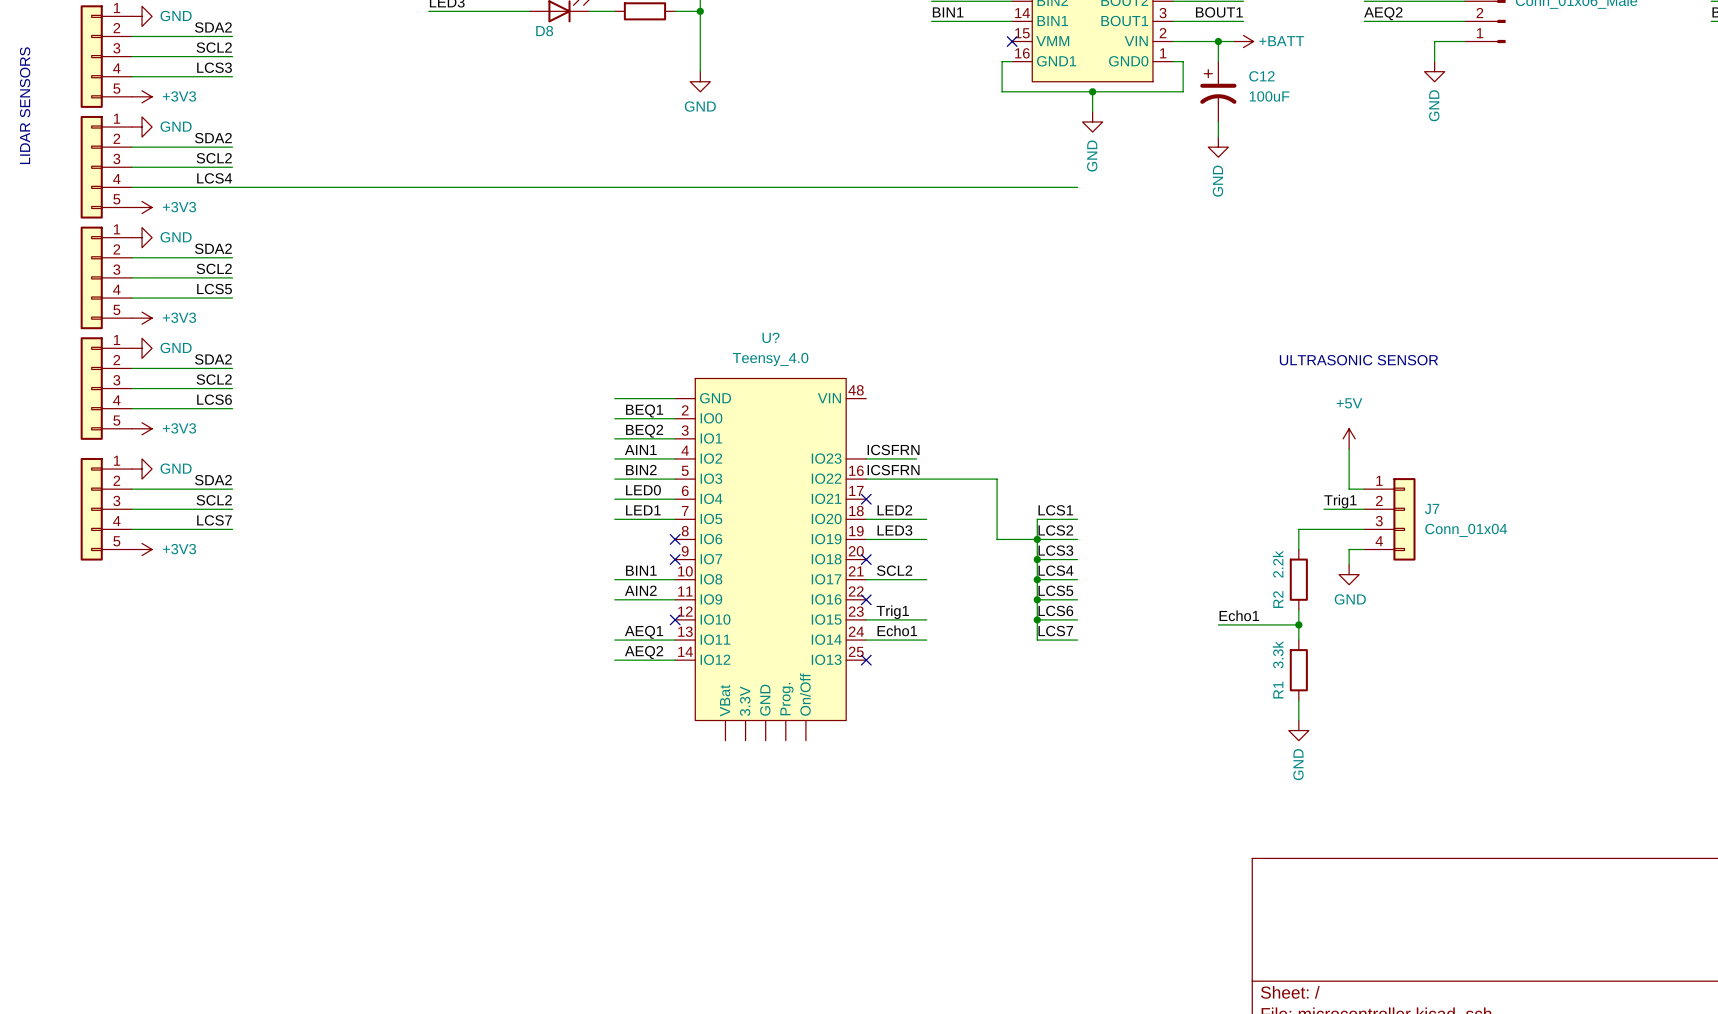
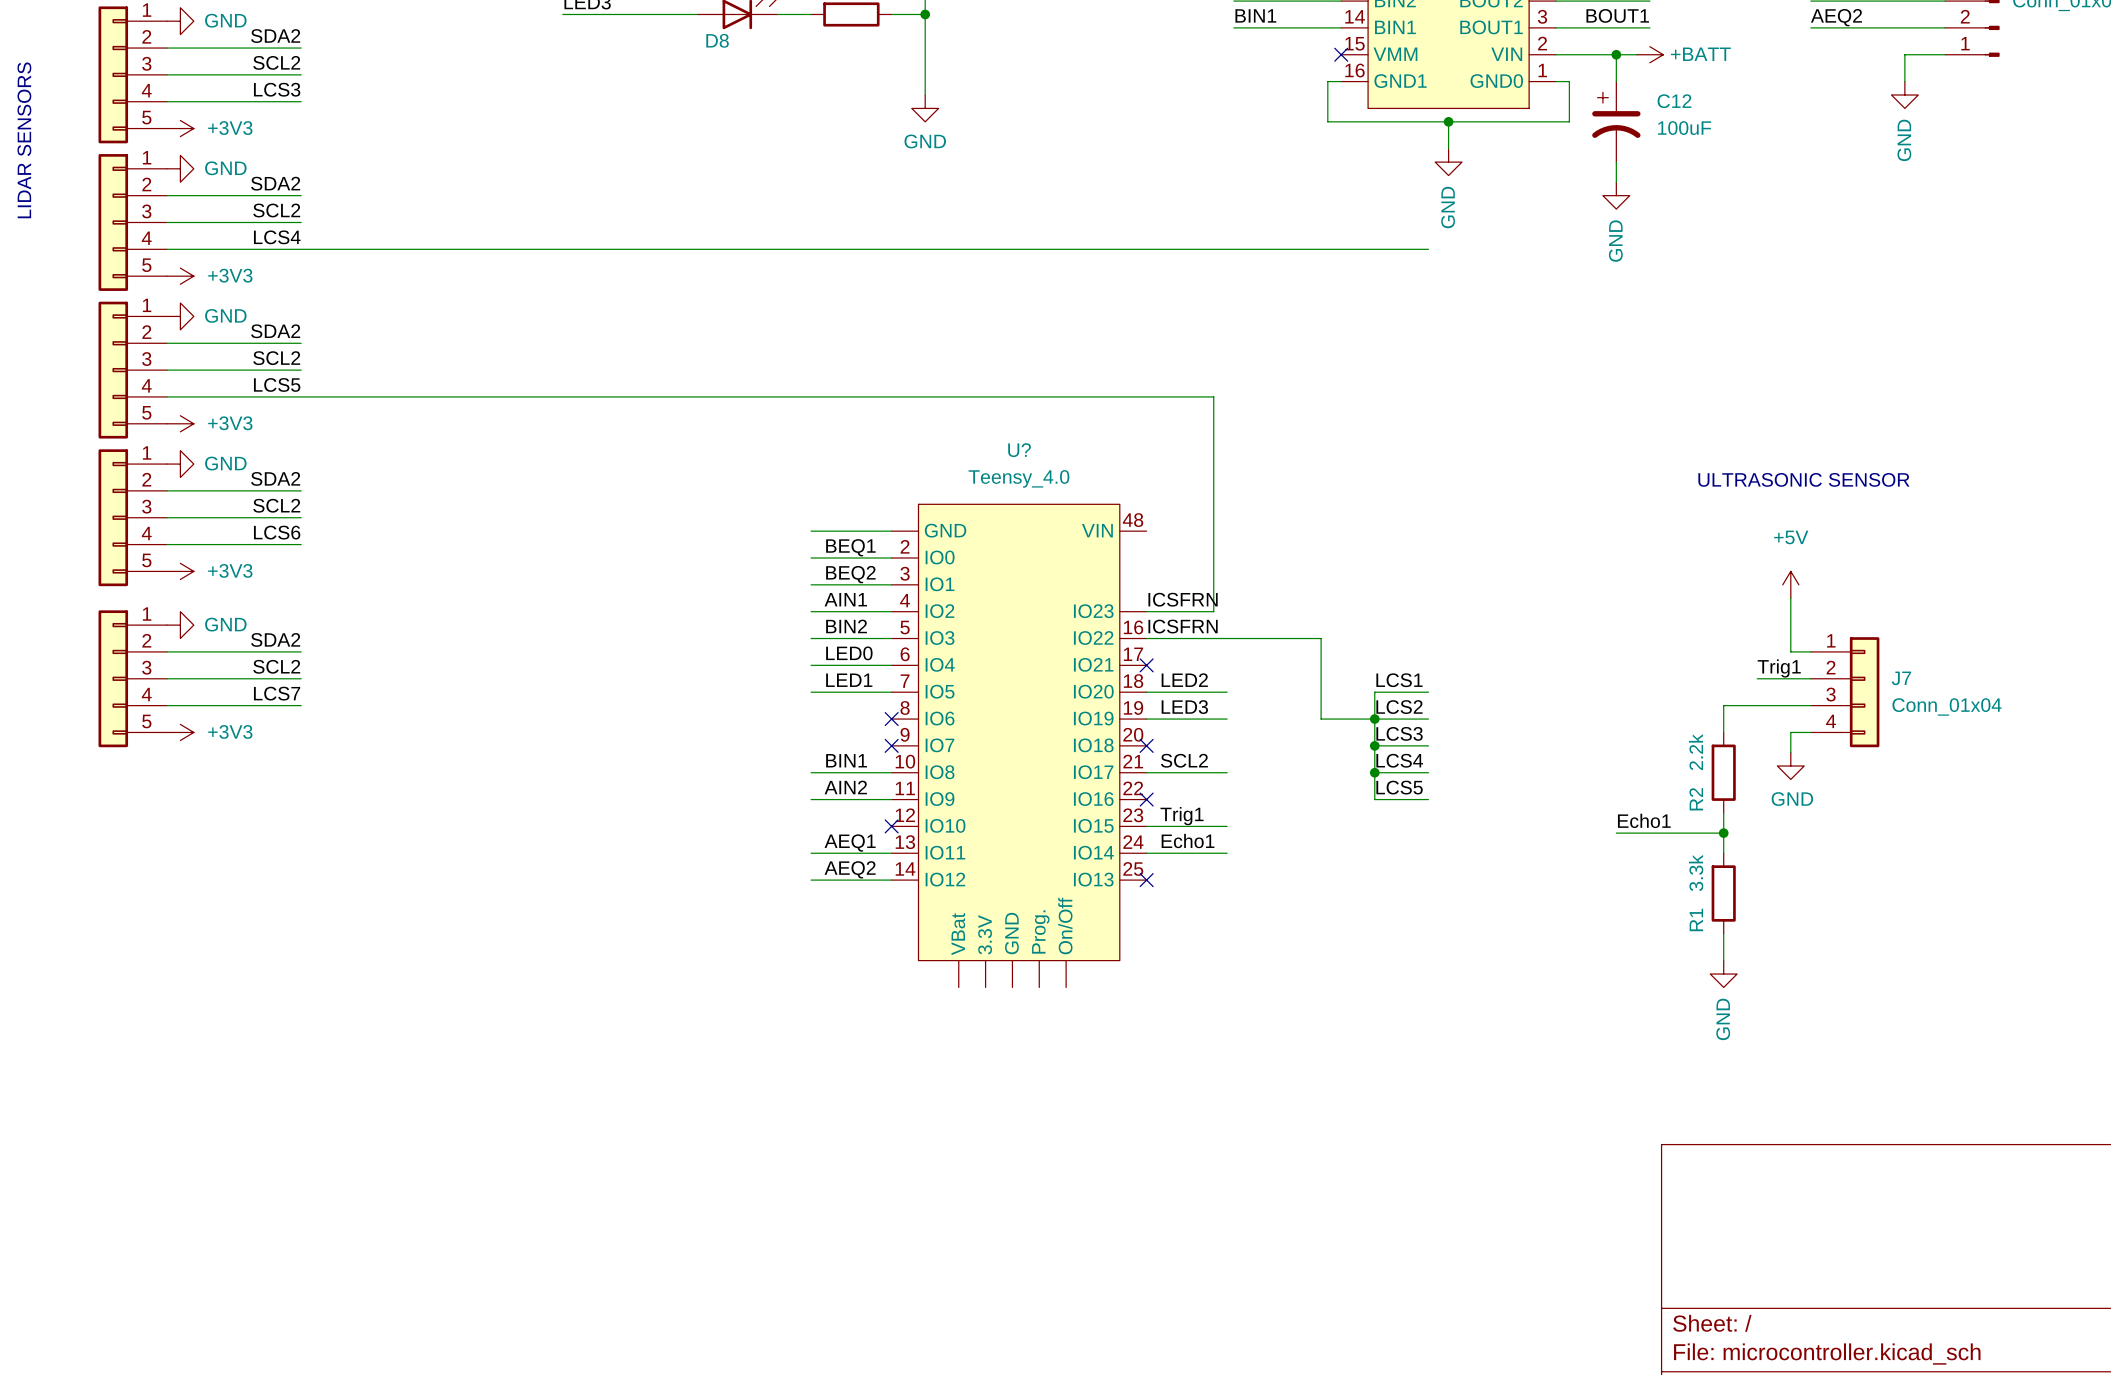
wire: none -> (301, 396) (1213, 396) (1213, 611)
wire: (1037, 599) (1037, 640) (1077, 640) -> none
junction: (1037, 599) -> none
label: LCS6 (1055, 610) -> none
wire: (1037, 619) (1077, 619) -> none
junction: (1037, 619) -> none
label: LCS7 (1055, 631) -> none

